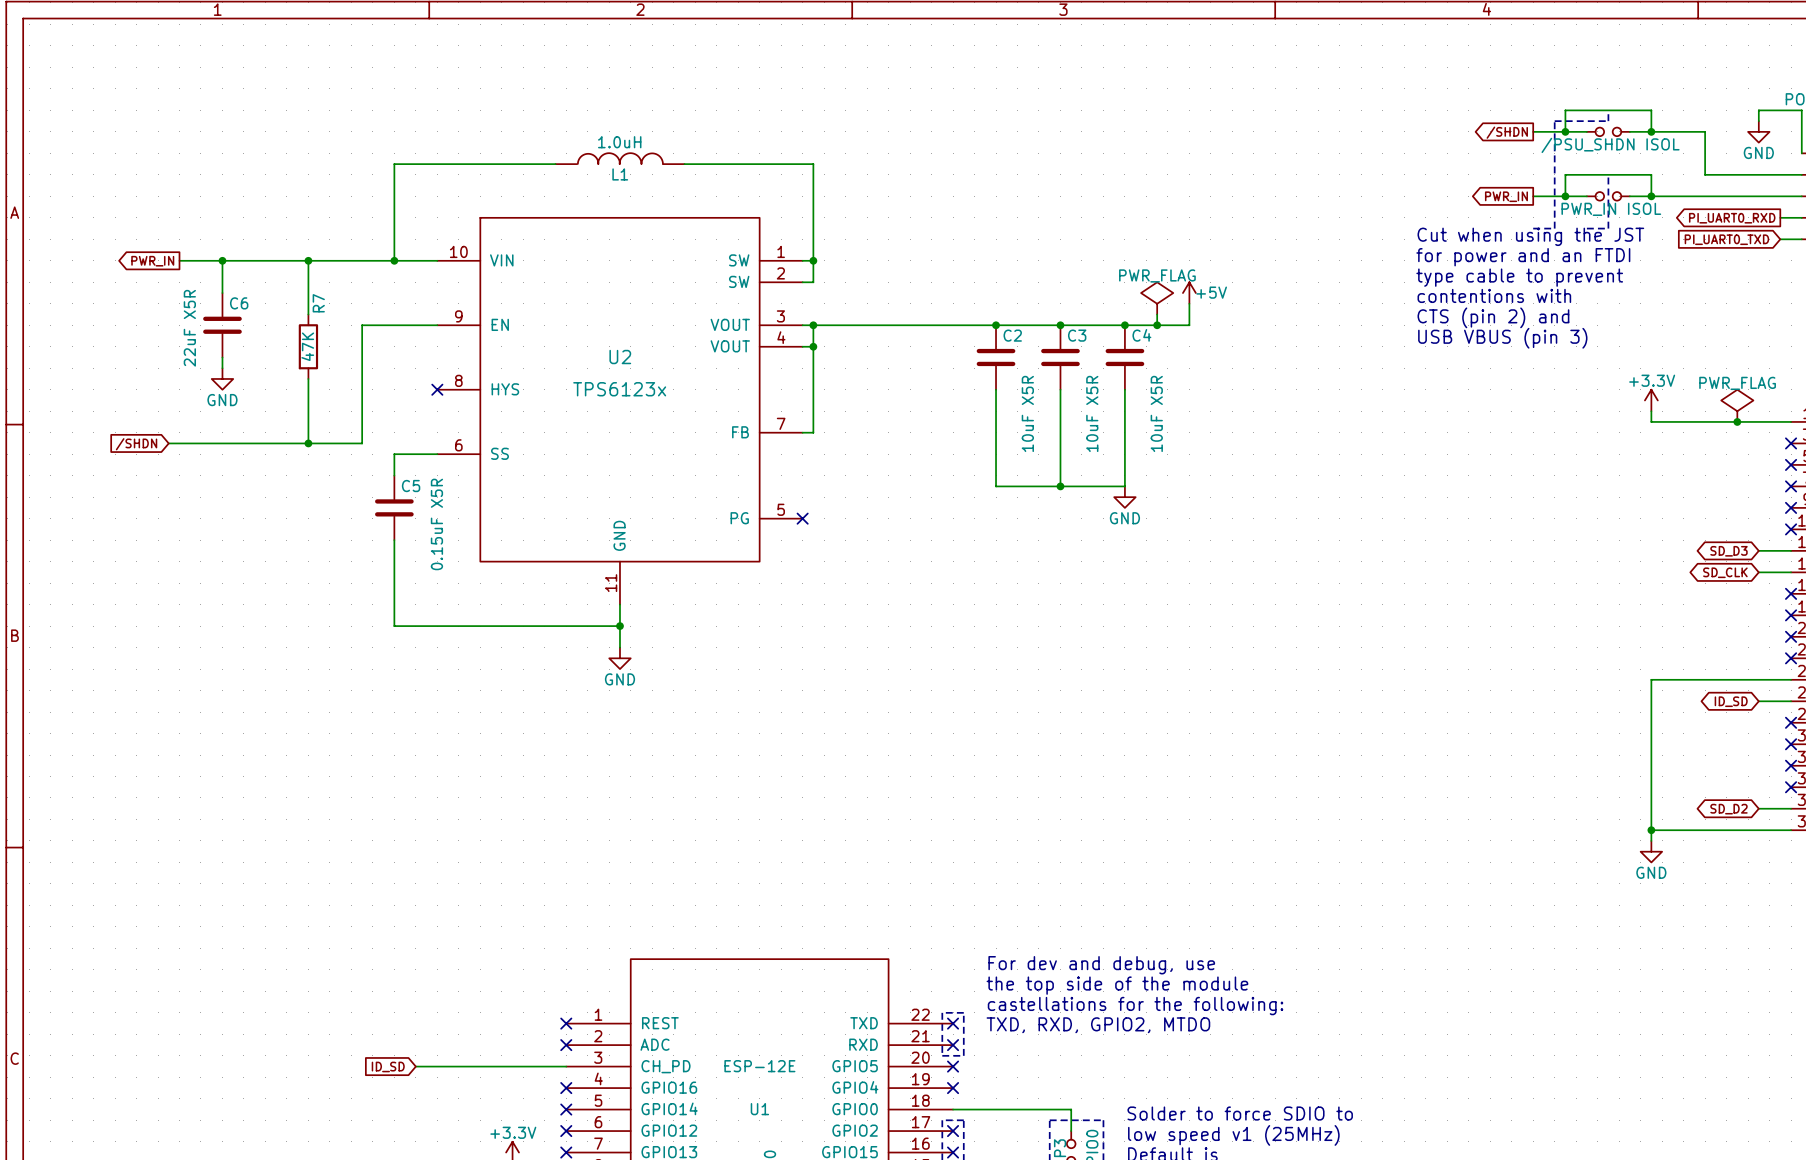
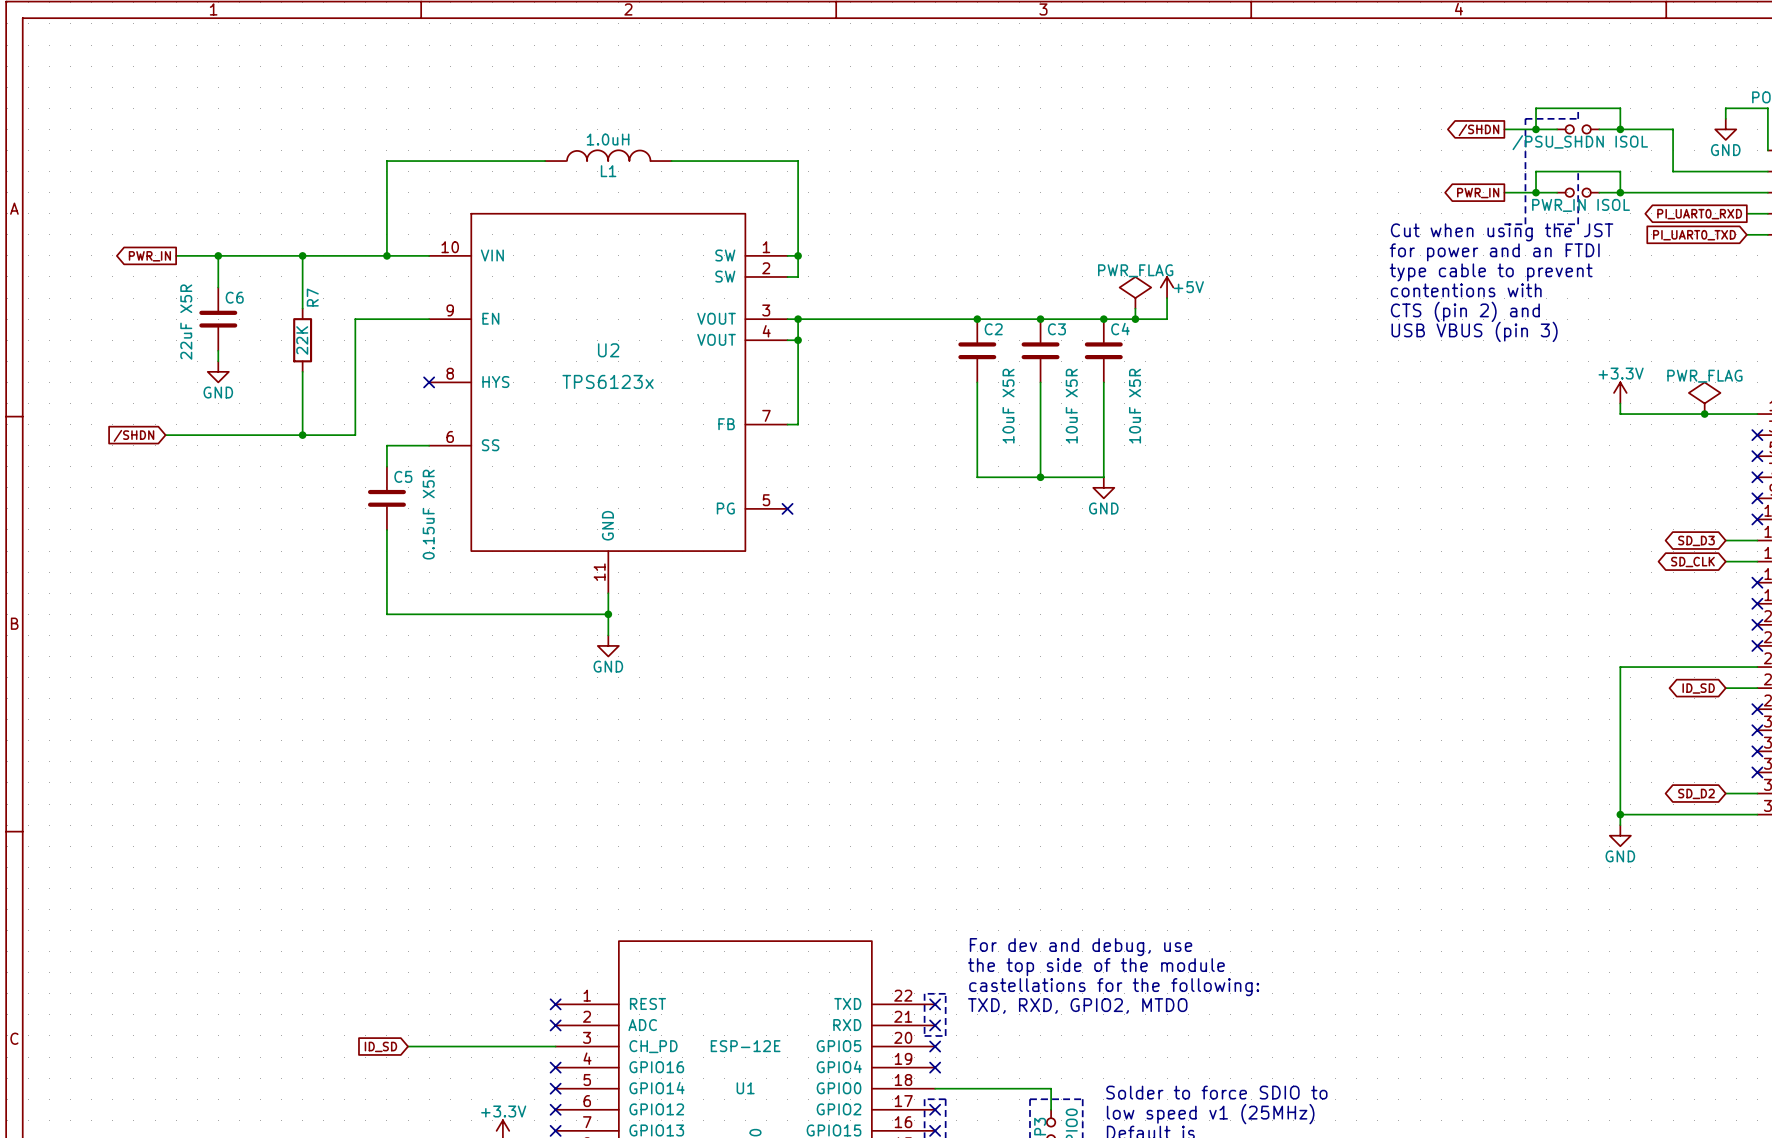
R7 value: 47K (307, 346) -> 22K (302, 340)

